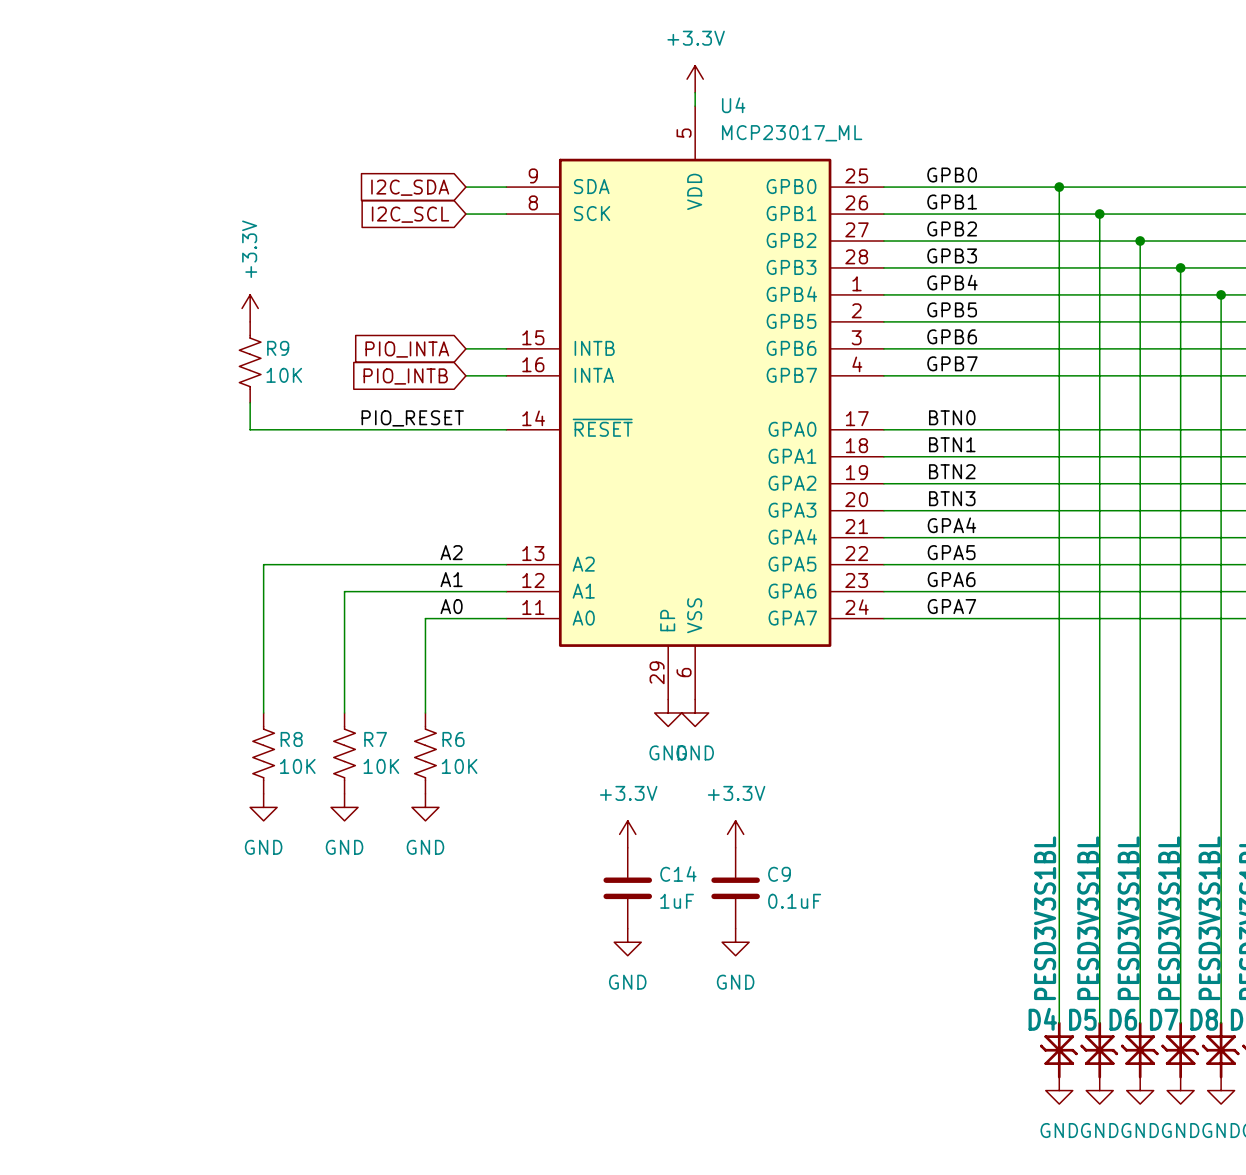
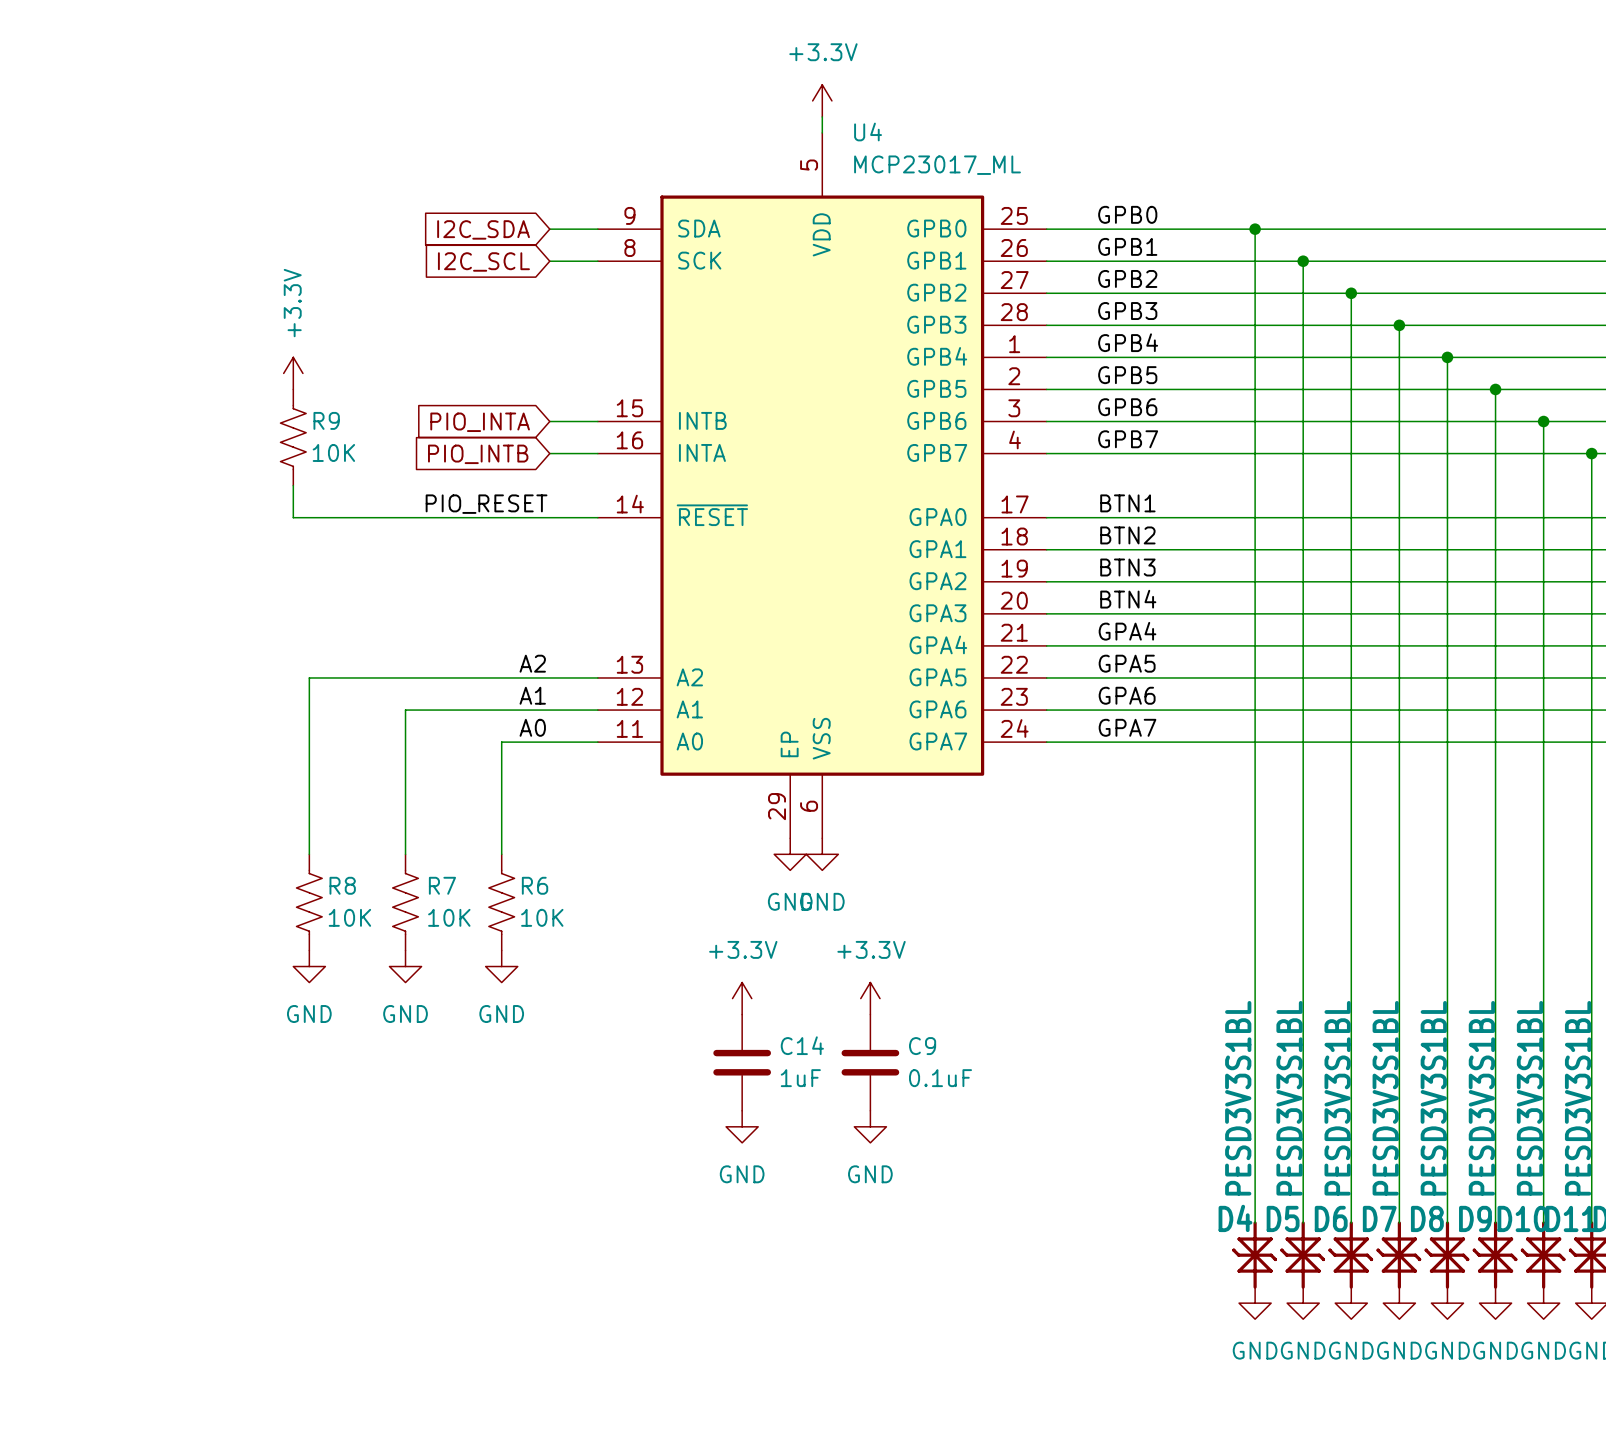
label: BTN0 (952, 417) -> BTN1 (1127, 503)
label: BTN1 (952, 444) -> BTN2 (1127, 535)
label: BTN2 (952, 471) -> BTN3 (1127, 567)
label: BTN3 (952, 498) -> BTN4 (1128, 599)

